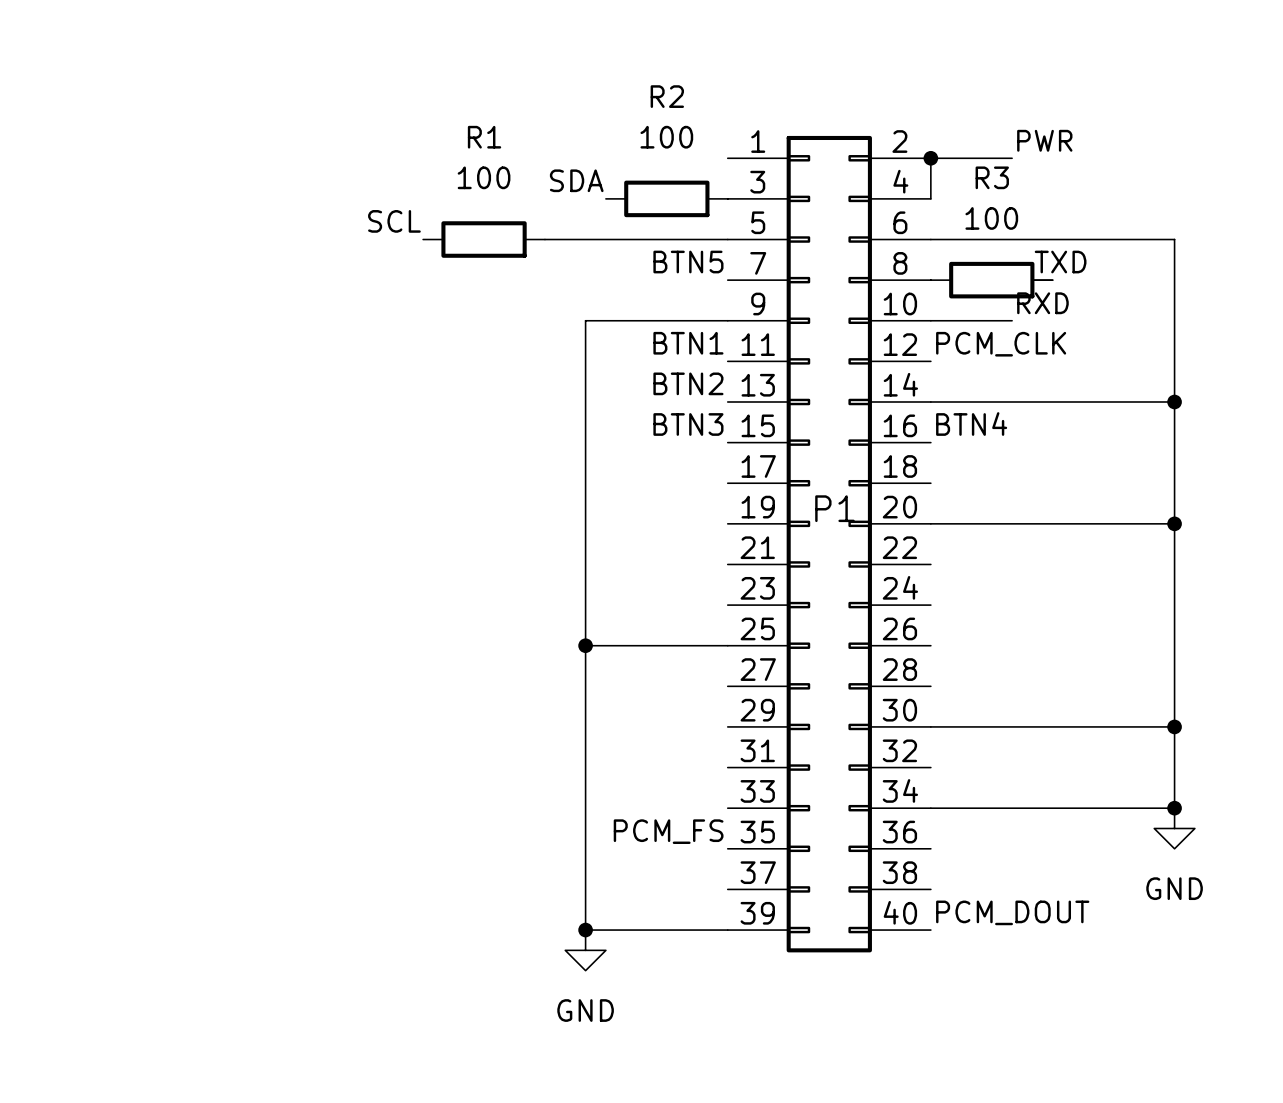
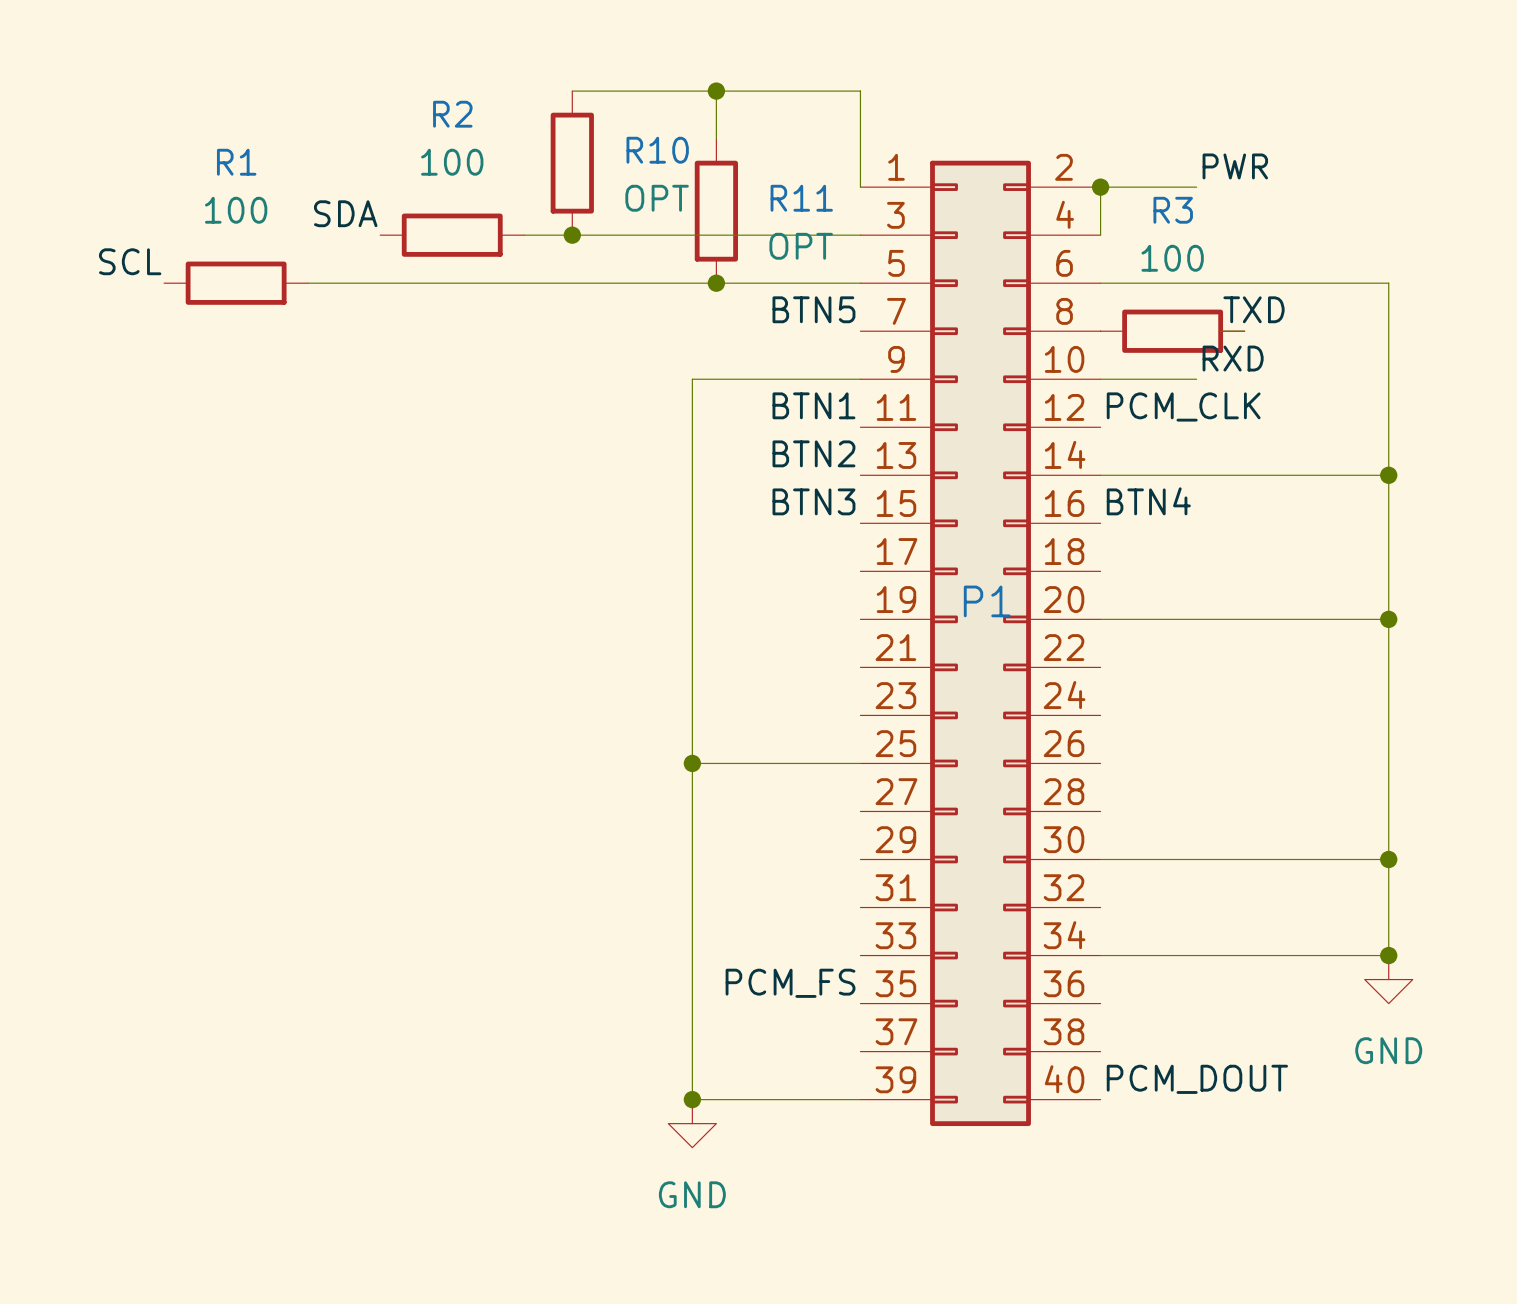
wire: none -> (572, 91) (860, 91) (860, 187)
wire: none -> (716, 91) (716, 139)
junction: none -> (716, 91)
R10: none -> OPT (572, 163)
R11: none -> OPT (716, 211)
label position: SDA (576, 180) -> SDA (345, 213)
wire: none -> (524, 235) (860, 235)
junction: none -> (572, 235)
R2 position: (666, 198) -> (452, 235)
label position: SCL (394, 221) -> SCL (130, 261)
wire: none -> (308, 283) (644, 283)
R1 position: (484, 239) -> (236, 283)
junction: none -> (716, 283)

